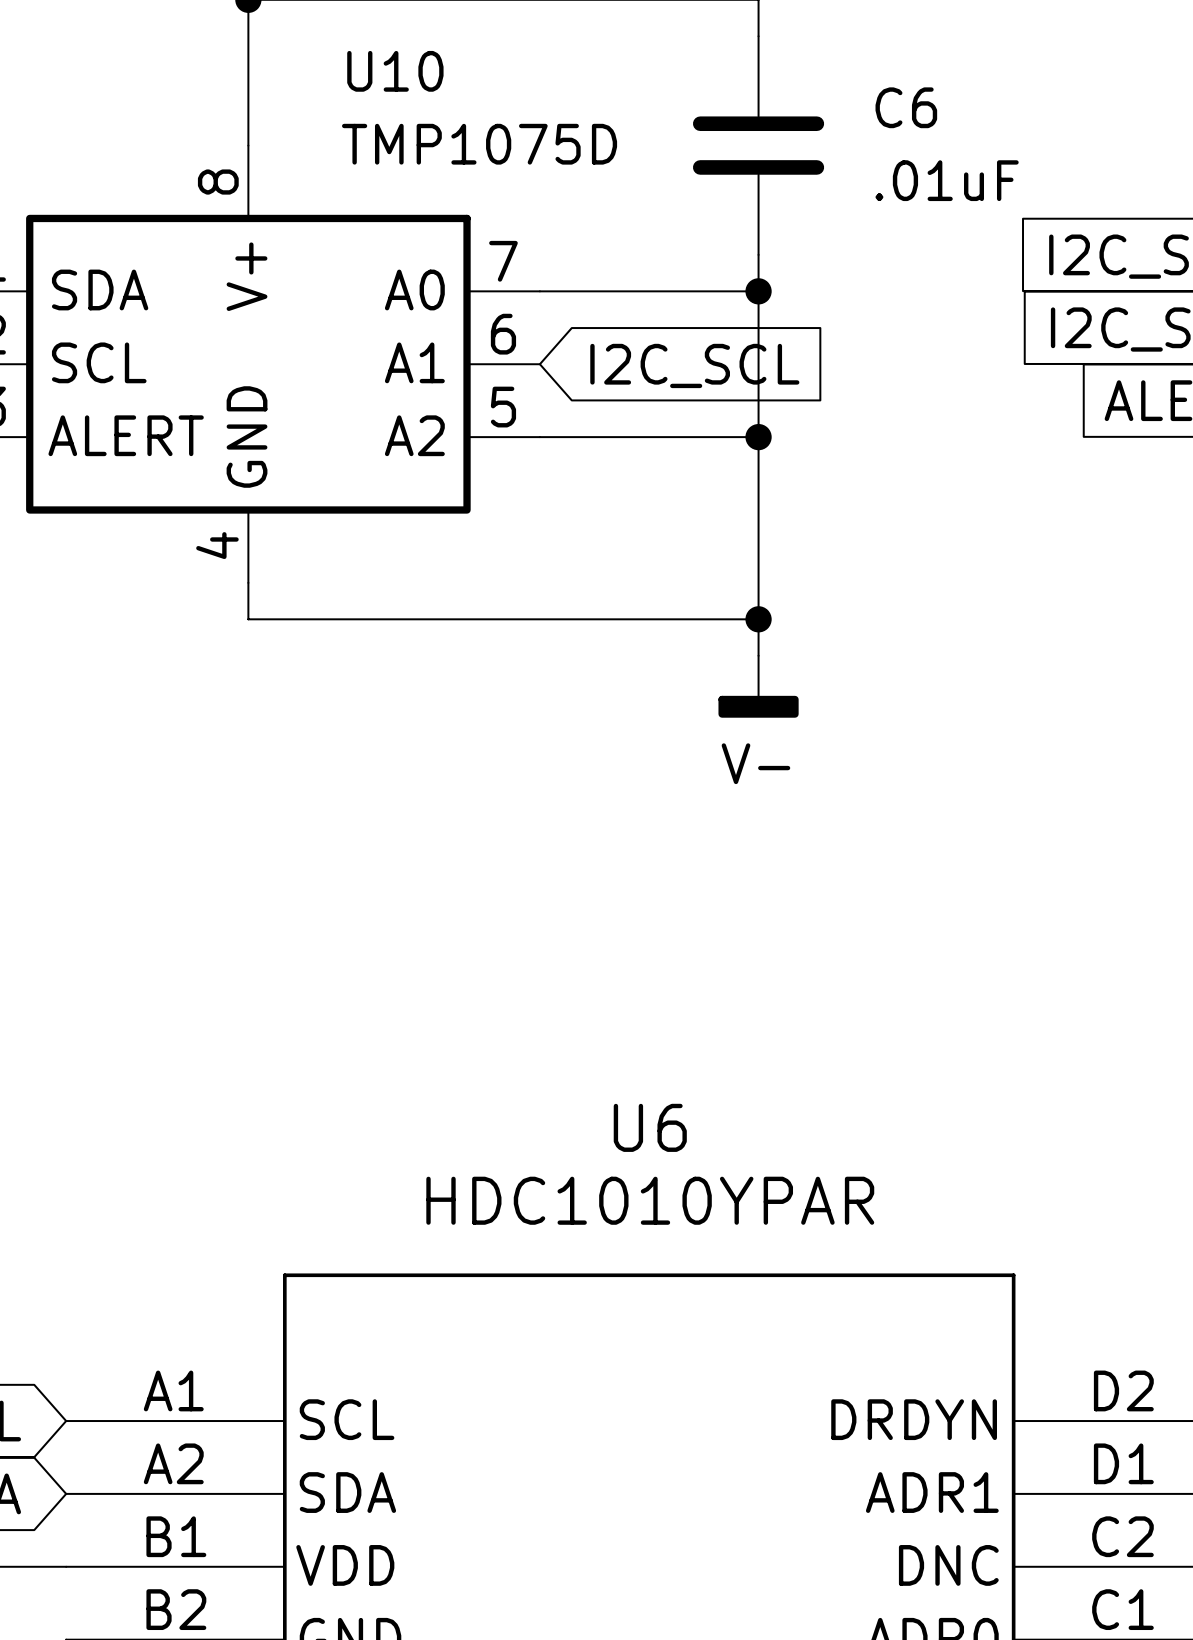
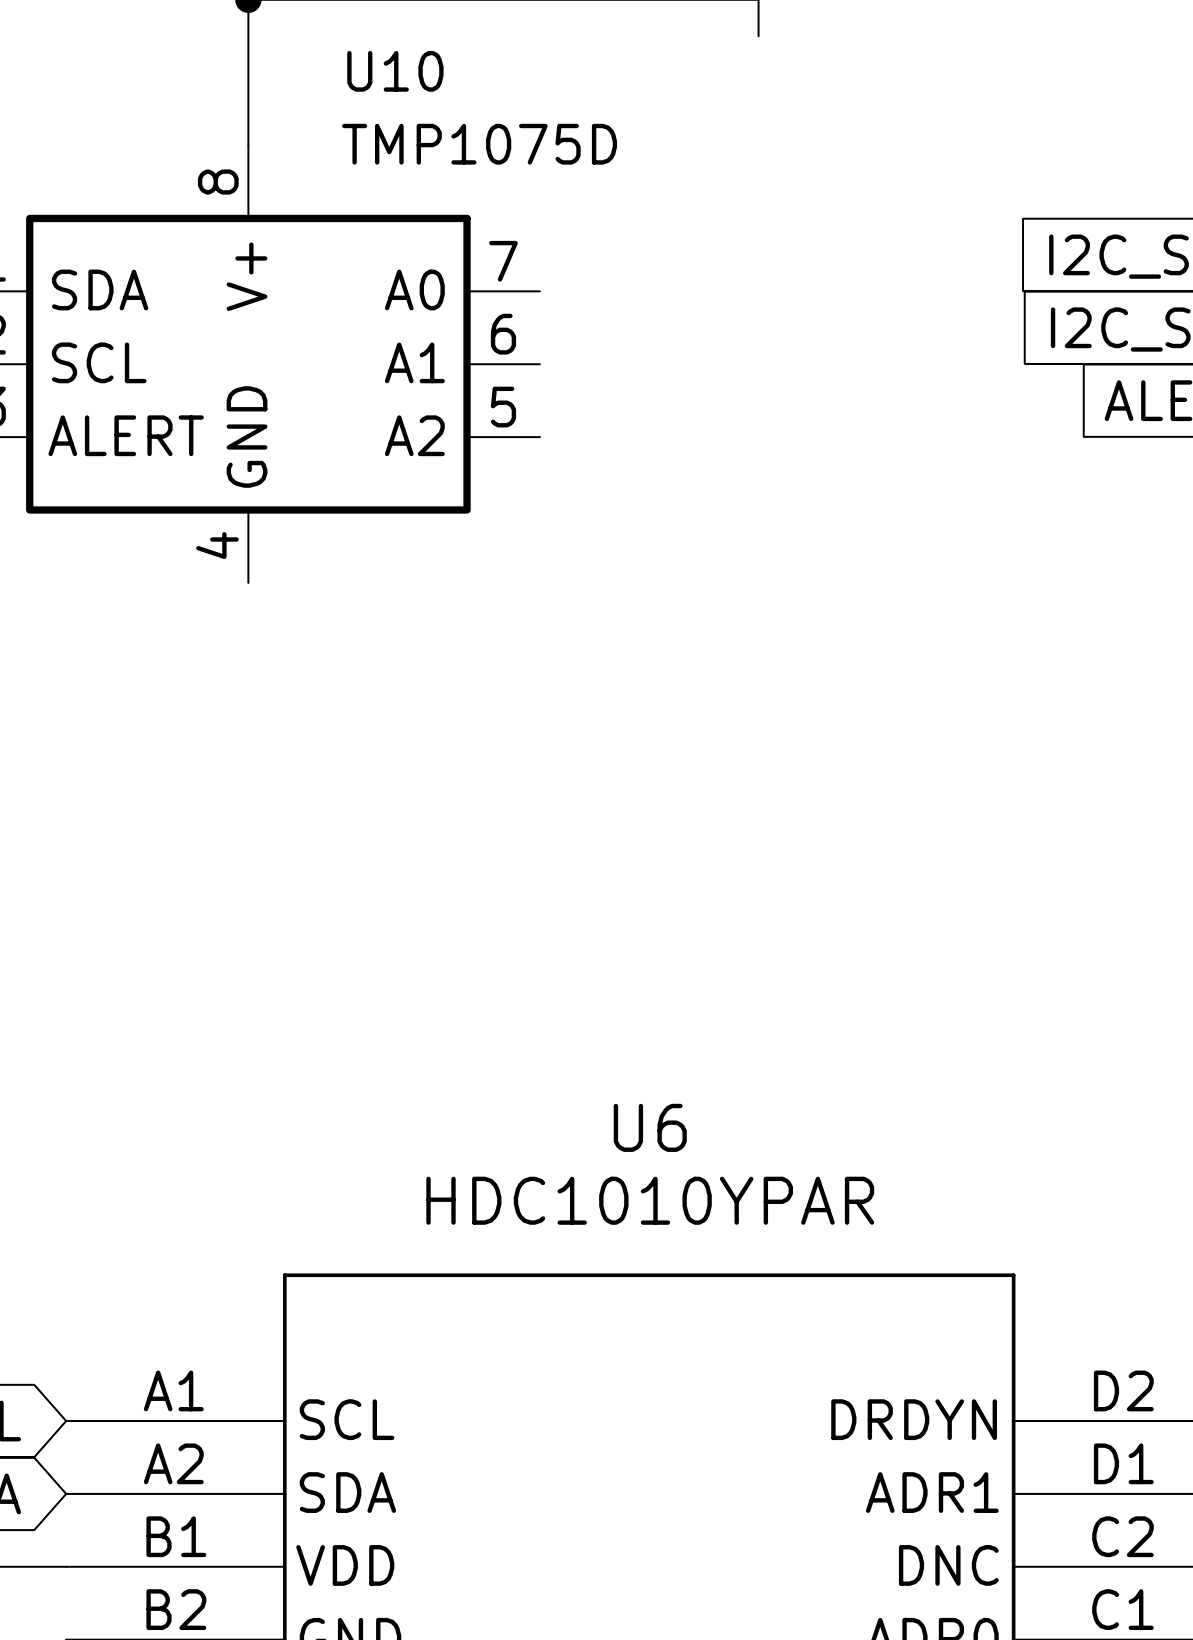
C6: .01uF (758, 145) -> none
wire: (758, 254) (758, 655) -> none
wire: (539, 291) (758, 291) -> none
junction: (758, 291) -> none
global label: I2C_SCL (694, 365) -> none
wire: (539, 437) (758, 437) -> none
junction: (758, 437) -> none
wire: (248, 582) (248, 619) (758, 619) -> none
junction: (758, 619) -> none
power symbol: V- (758, 686) -> none

